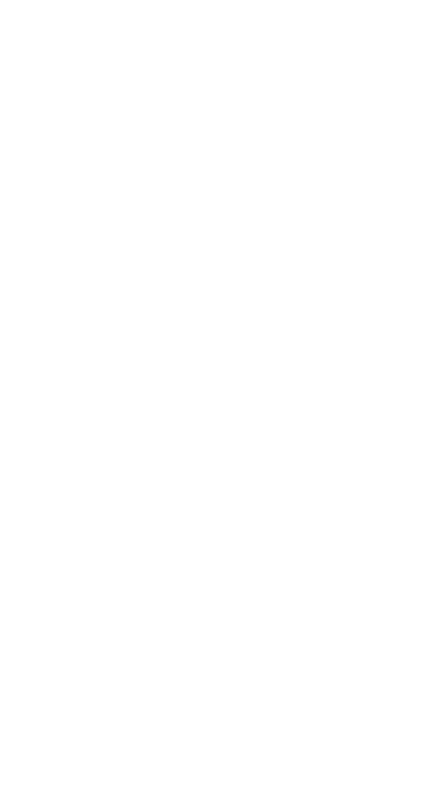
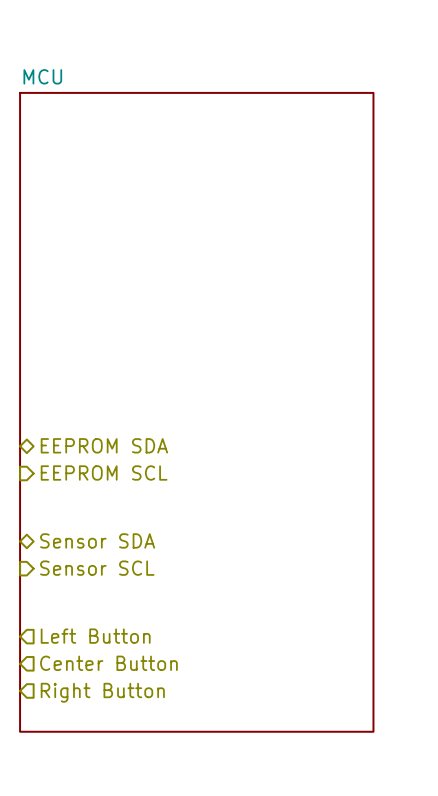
sheet MCU: none -> (196, 412)
hierarchical label: none -> EEPROM SDA (104, 445)
hierarchical label: none -> EEPROM SCL (104, 472)
hierarchical label: none -> Sensor SDA (97, 540)
hierarchical label: none -> Sensor SCL (97, 568)
hierarchical label: none -> Left Button (95, 636)
hierarchical label: none -> Center Button (108, 663)
hierarchical label: none -> Right Button (102, 692)

